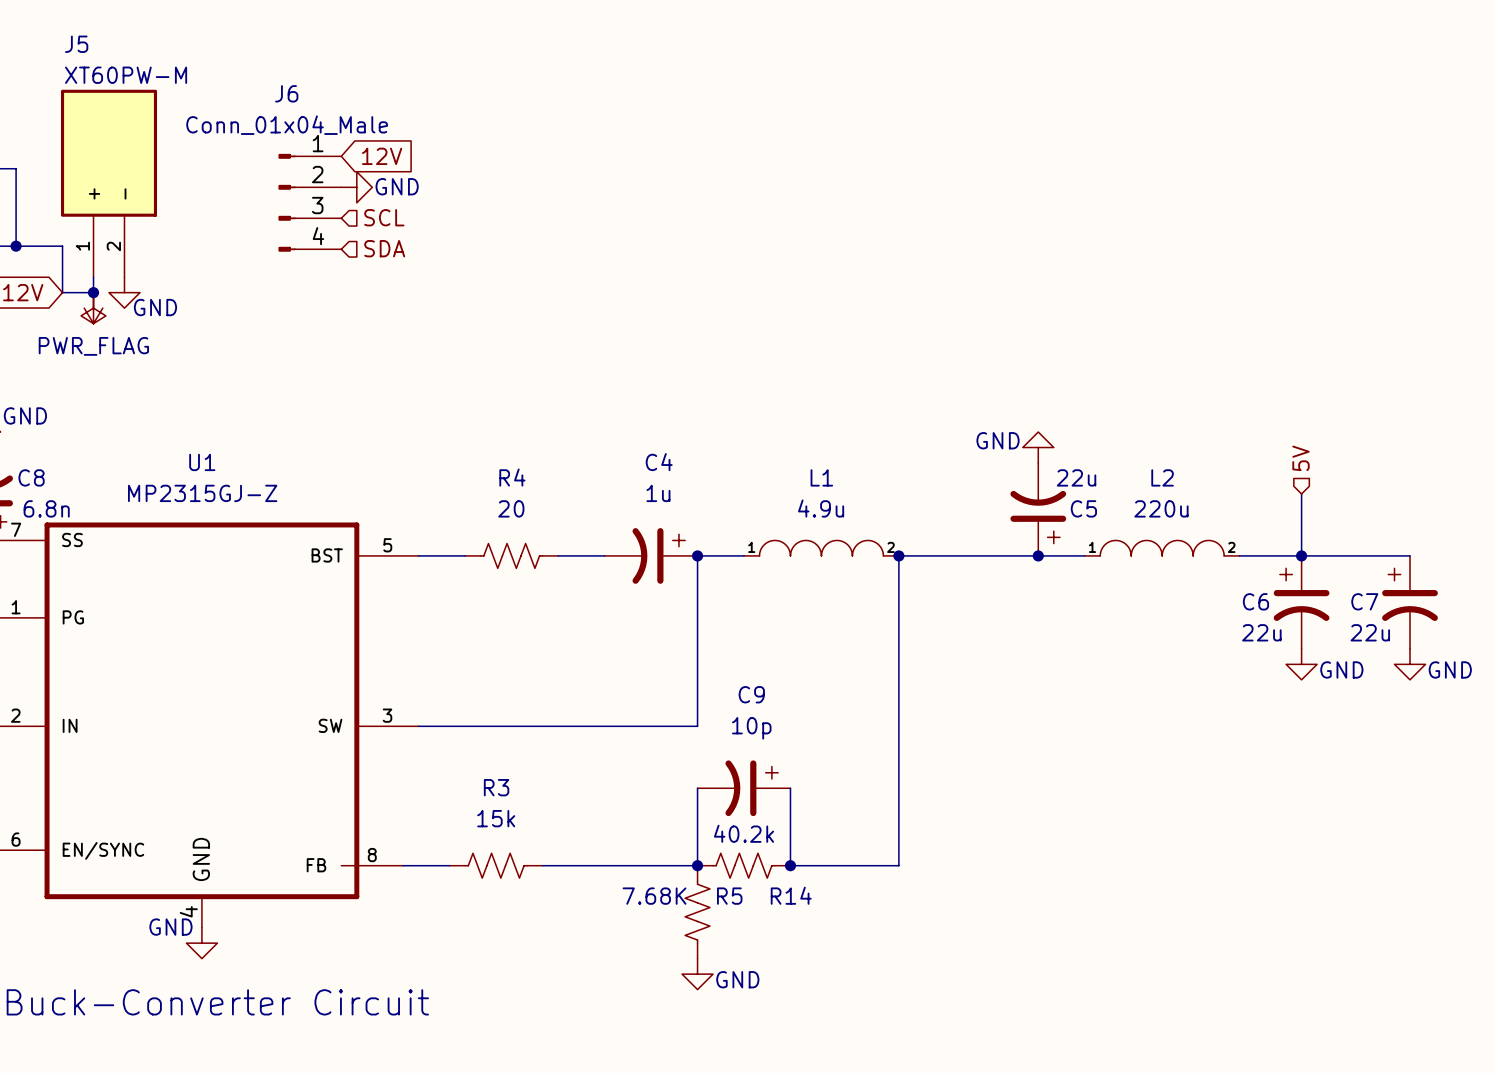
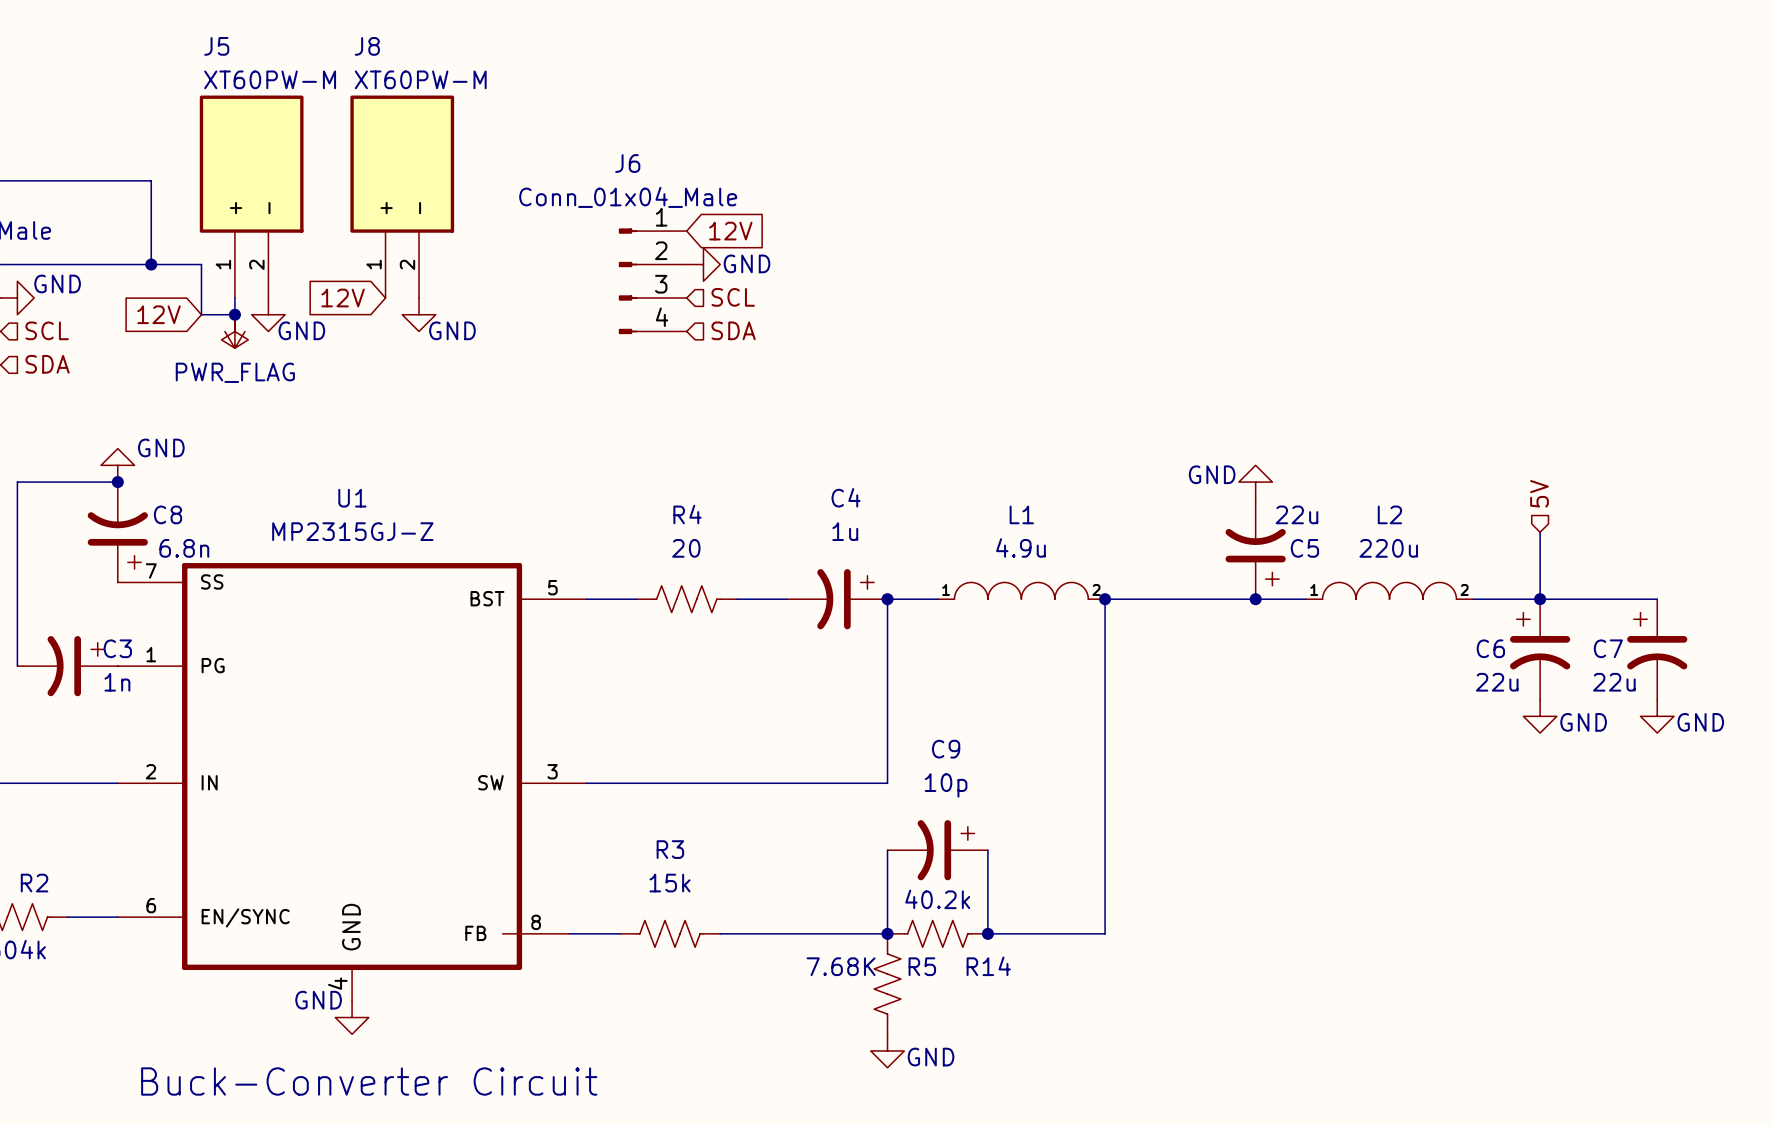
global label: 12V (382, 156) -> none
J8: none -> XT60PW-M (402, 196)
power symbol: GND (356, 187) -> none
J6 position: (309, 202) -> (652, 281)
global label: none -> 12V (730, 231)
hierarchical label position: SCL (384, 217) -> SCL (733, 297)
power symbol: none -> GND (703, 264)
hierarchical label position: SDA (384, 248) -> SDA (733, 330)
global label: none -> 12V (343, 298)
power symbol: none -> GND (418, 314)

